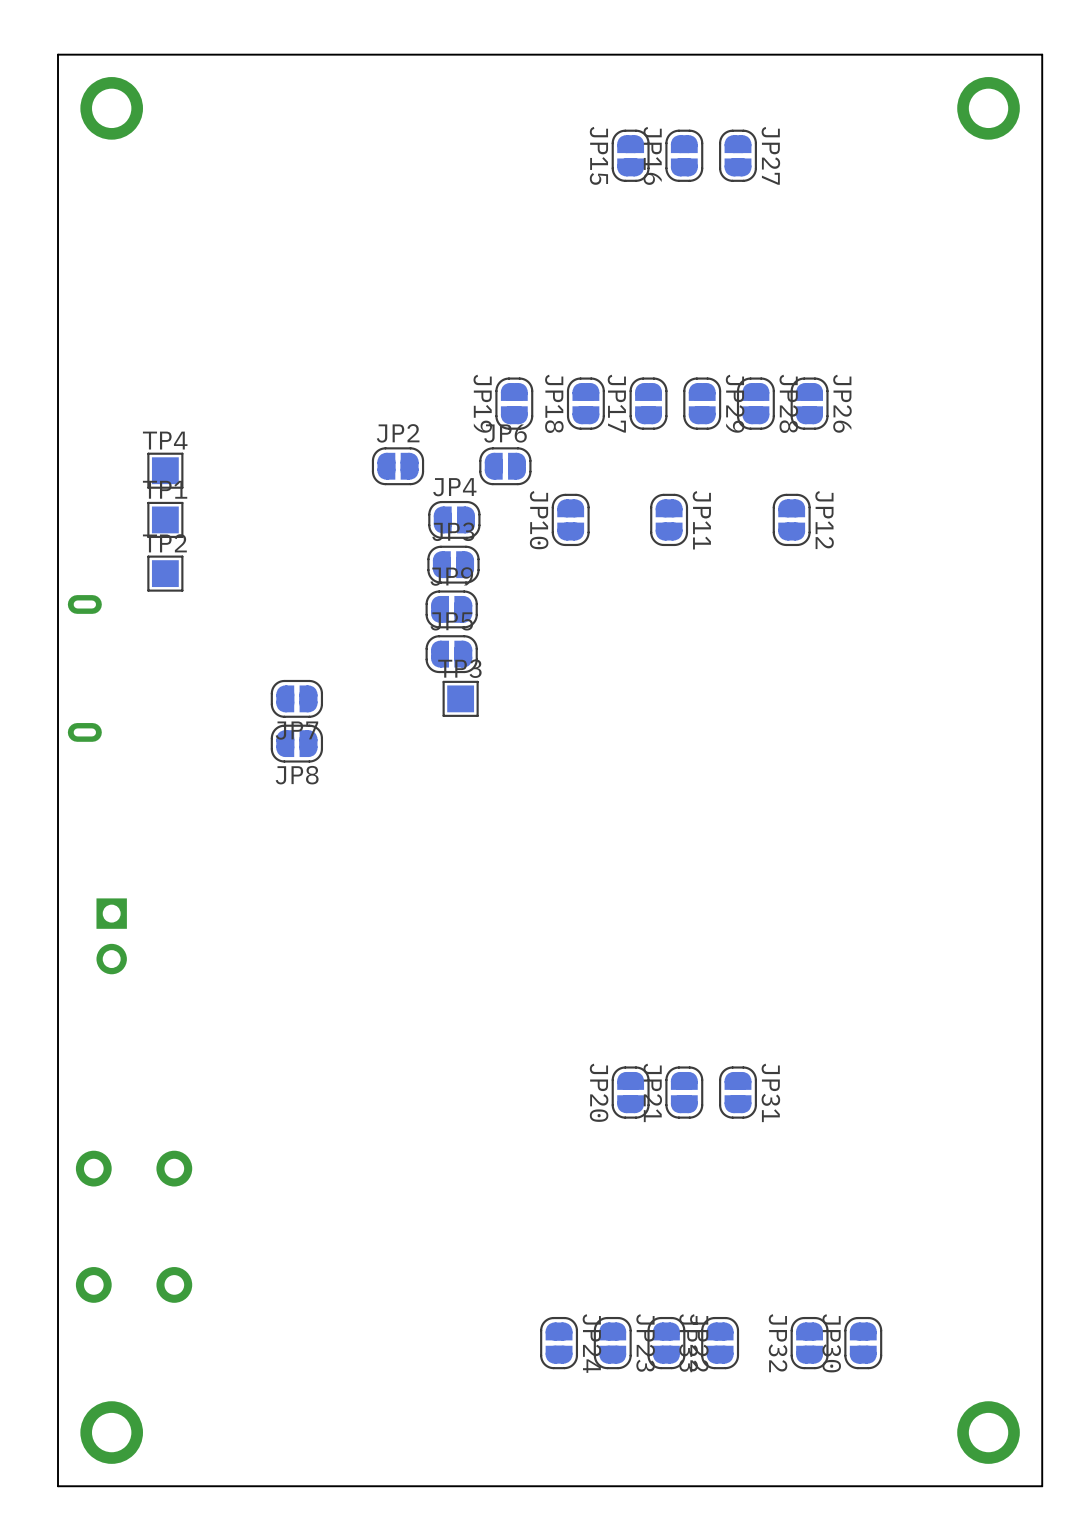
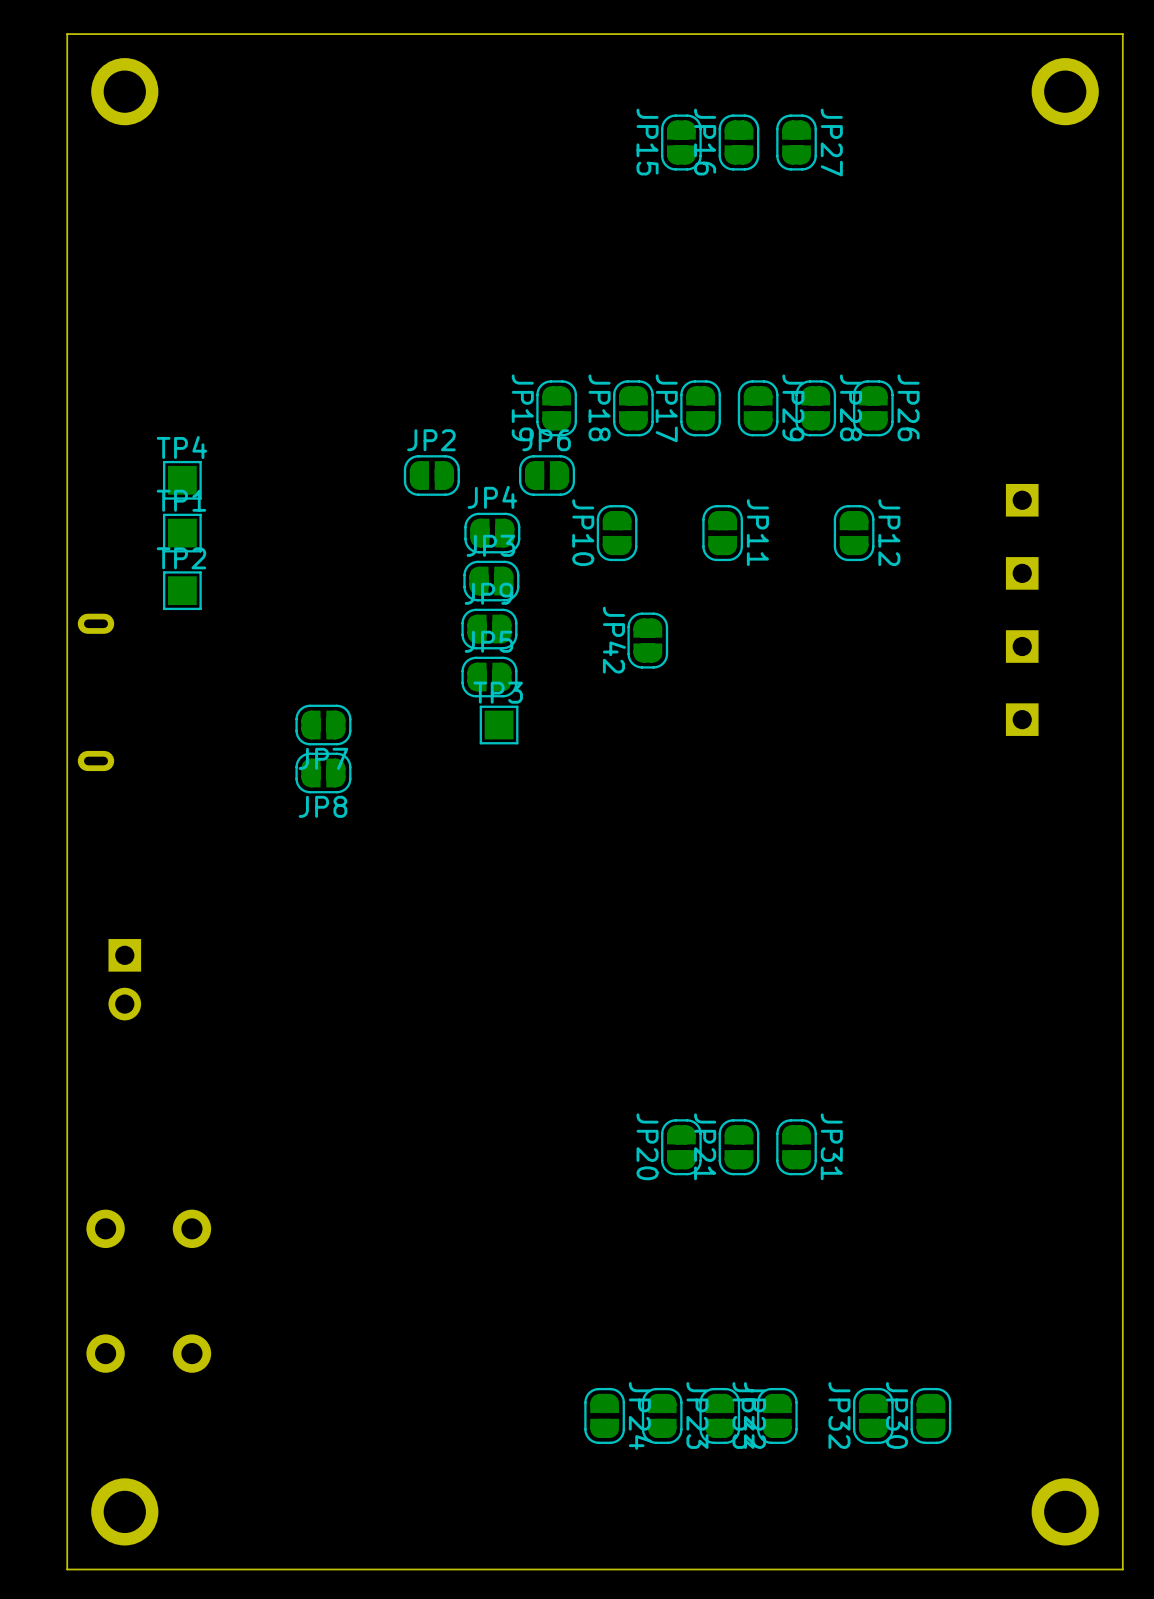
part: none -> (1022, 500)
part: none -> (1022, 573)
JP42: none -> (647, 640)
part: none -> (1022, 646)
part: none -> (1022, 719)

